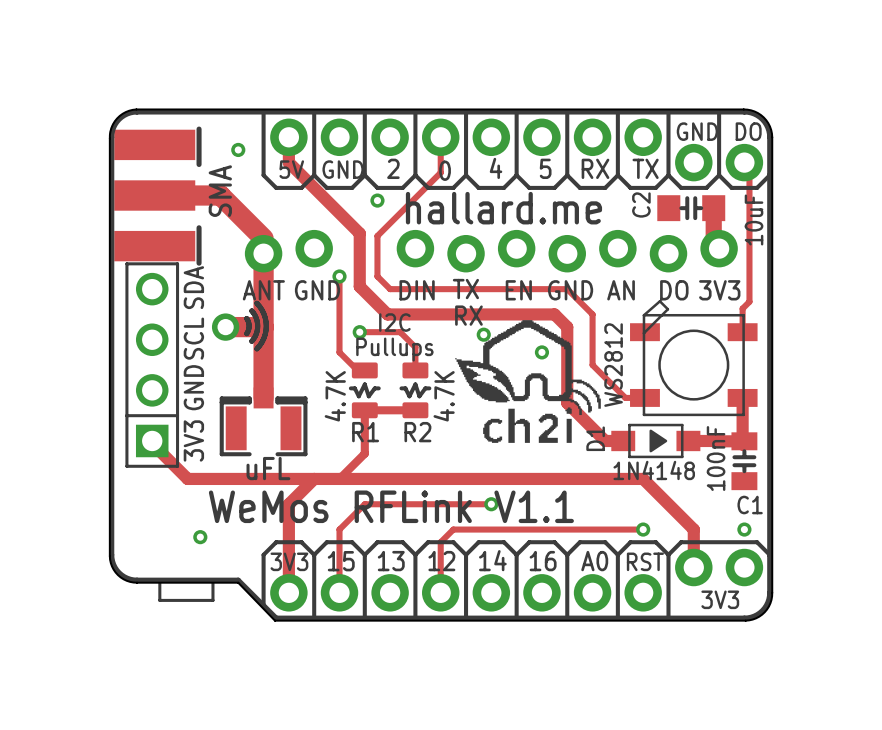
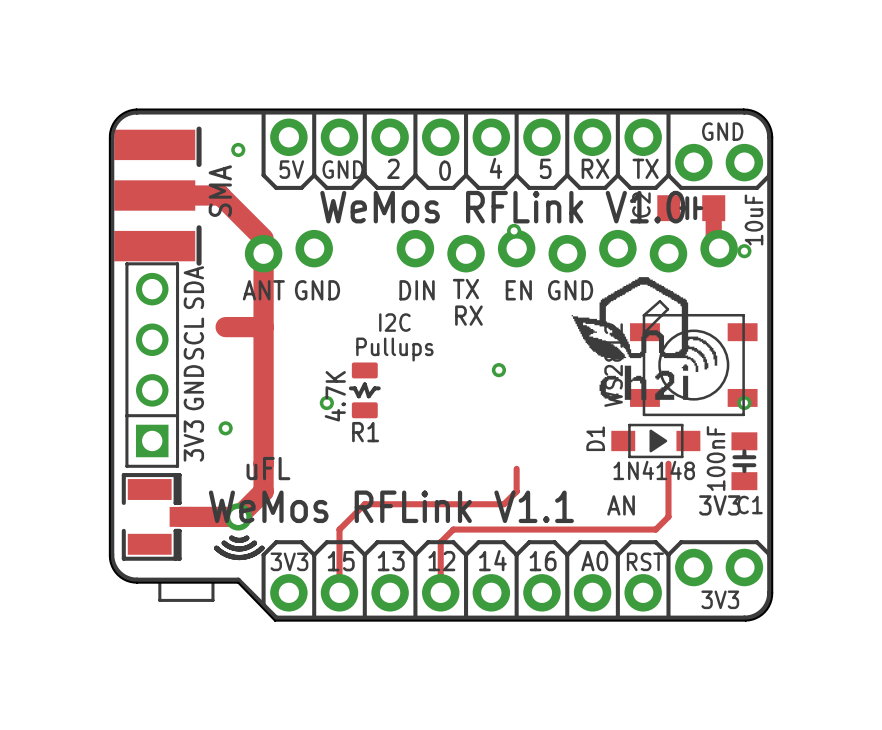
line: (719, 111) (719, 175) -> none
text position: GND (697, 131) -> GND (722, 131)
text: DO (748, 131) -> none
track: (288, 137) (288, 162) (359, 233) (359, 286) (387, 314) (554, 314) (567, 327) (567, 403) (605, 440) (623, 440) -> none
track: (440, 137) (440, 172) (377, 236) (377, 276) (390, 289) (567, 289) (592, 314) (592, 365) (625, 397) (644, 397) -> none
part: none -> (719, 162)
track: (744, 162) (749, 167) (749, 301) (742, 308) (742, 332) -> none
part: (744, 162) -> none
line: (719, 175) (706, 187) -> (731, 187) (706, 187)
line: (719, 175) (731, 187) -> none
via: (377, 200) -> none
text: hallard.me (503, 208) -> WeMos RFLink V1.0 (502, 207)
via: none -> (514, 230)
via: none -> (744, 251)
track: (339, 276) (339, 352) (357, 370) (364, 370) -> none
via: (339, 276) -> none
text position: AN (621, 290) -> AN (621, 505)
text: DO (674, 290) -> none
text position: 3V3 (719, 290) -> 3V3 (719, 505)
line: (256, 303) (263, 313) (266, 326) (263, 338) (256, 348) (259, 345) (263, 338) (266, 330) (266, 326) (266, 321) (263, 313) (259, 306) (256, 303) -> none
line: (251, 310) (256, 317) (257, 326) (256, 334) (251, 341) (253, 339) (256, 334) (257, 331) (257, 326) (257, 320) (256, 317) (253, 313) (251, 310) -> none
line: (246, 318) (249, 326) (246, 333) (248, 329) (249, 326) (248, 322) (246, 318) -> none
part position: (225, 327) -> (238, 516)
track: (359, 332) (400, 332) (415, 347) (415, 370) -> none
via: (359, 332) -> none
via: (483, 334) -> none
via: (541, 352) -> none
via: none -> (498, 370)
drawing position: (528, 381) -> (644, 338)
R2: 4.7K (415, 390) -> none
track: none -> (263, 397) (263, 491) (238, 516) (180, 516)
track: (742, 397) (742, 444) (744, 441) (721, 441) (719, 440) (688, 440) -> none
via: none -> (326, 403)
via: none -> (744, 403)
track: (415, 410) (364, 410) (364, 453) (339, 478) -> none
part rotation: 0° (263, 421) -> 90° clockwise (156, 516)
part position: (263, 421) -> (156, 516)
via: none -> (225, 428)
track: (152, 440) (152, 443) (187, 478) (643, 478) (693, 529) (693, 567) -> none
track: none -> (668, 463) (668, 516) (655, 529) (643, 529)
track: none -> (516, 468) (516, 491) (503, 504) (491, 504)
track: (314, 478) (288, 504) (288, 592) -> none
via: (491, 504) -> none
via: (643, 529) -> none
via: (744, 529) -> none
via: (200, 537) -> none
line: none -> (231, 538) (239, 540) (246, 538) (242, 540) (239, 540) (236, 540) (231, 538)
line: none -> (224, 543) (231, 547) (239, 548) (247, 547) (254, 543) (252, 544) (247, 547) (244, 548) (239, 548) (233, 548) (231, 547) (226, 544) (224, 543)
line: none -> (216, 548) (226, 555) (239, 557) (251, 555) (262, 548) (258, 550) (251, 555) (243, 557) (239, 557) (235, 557) (226, 555) (219, 550) (216, 548)

